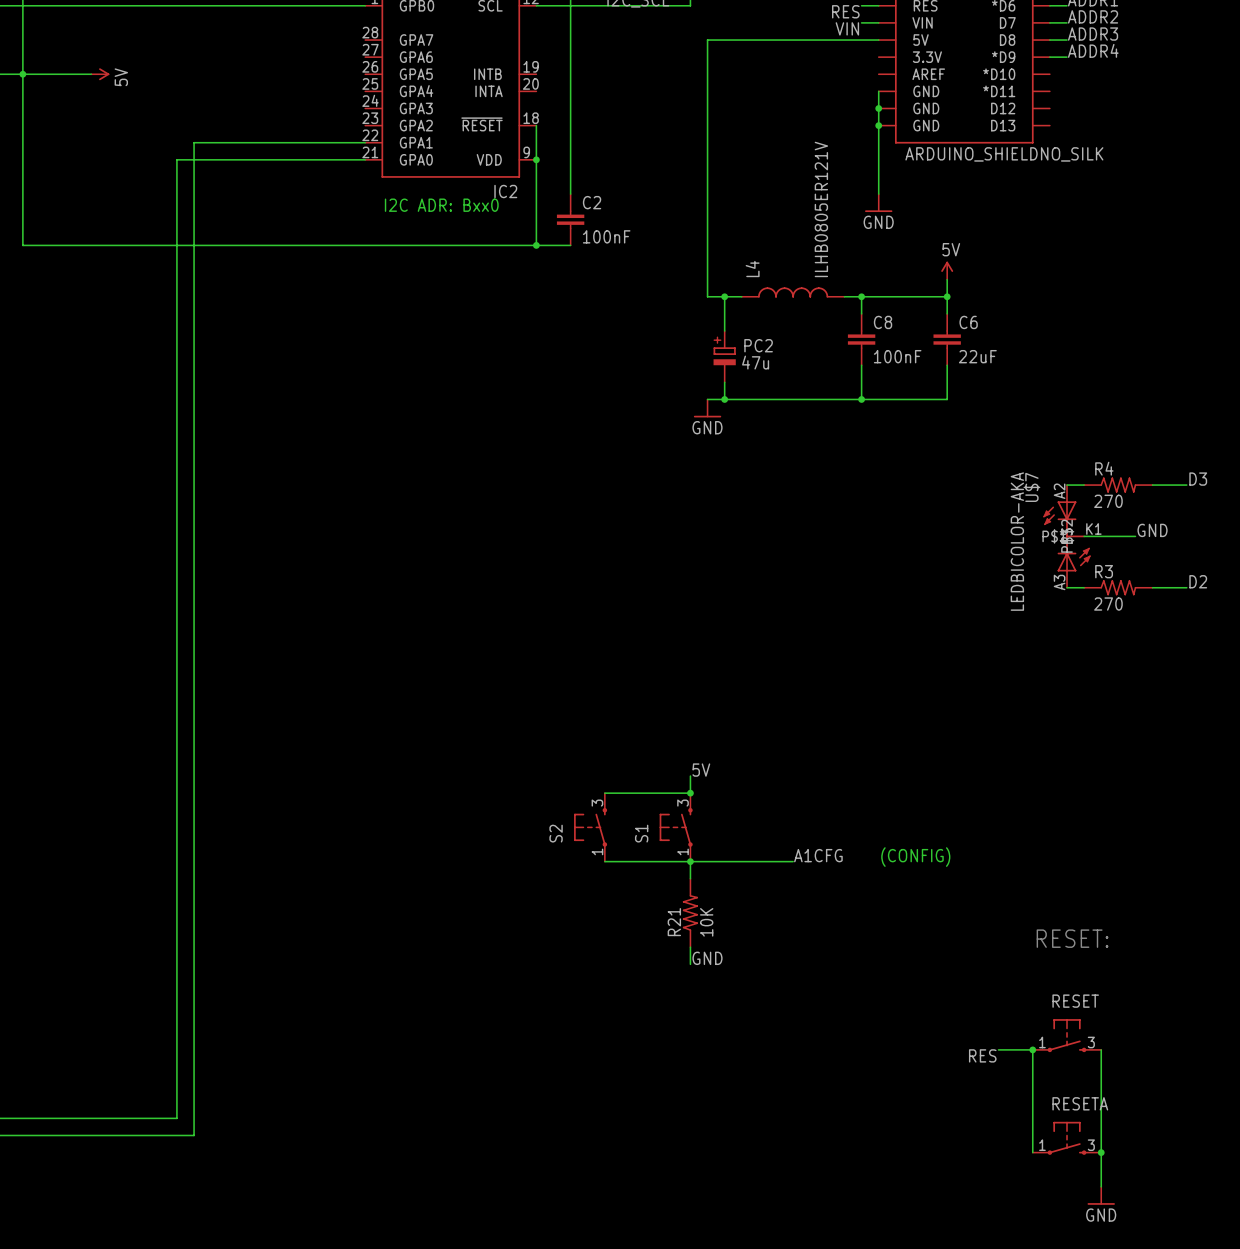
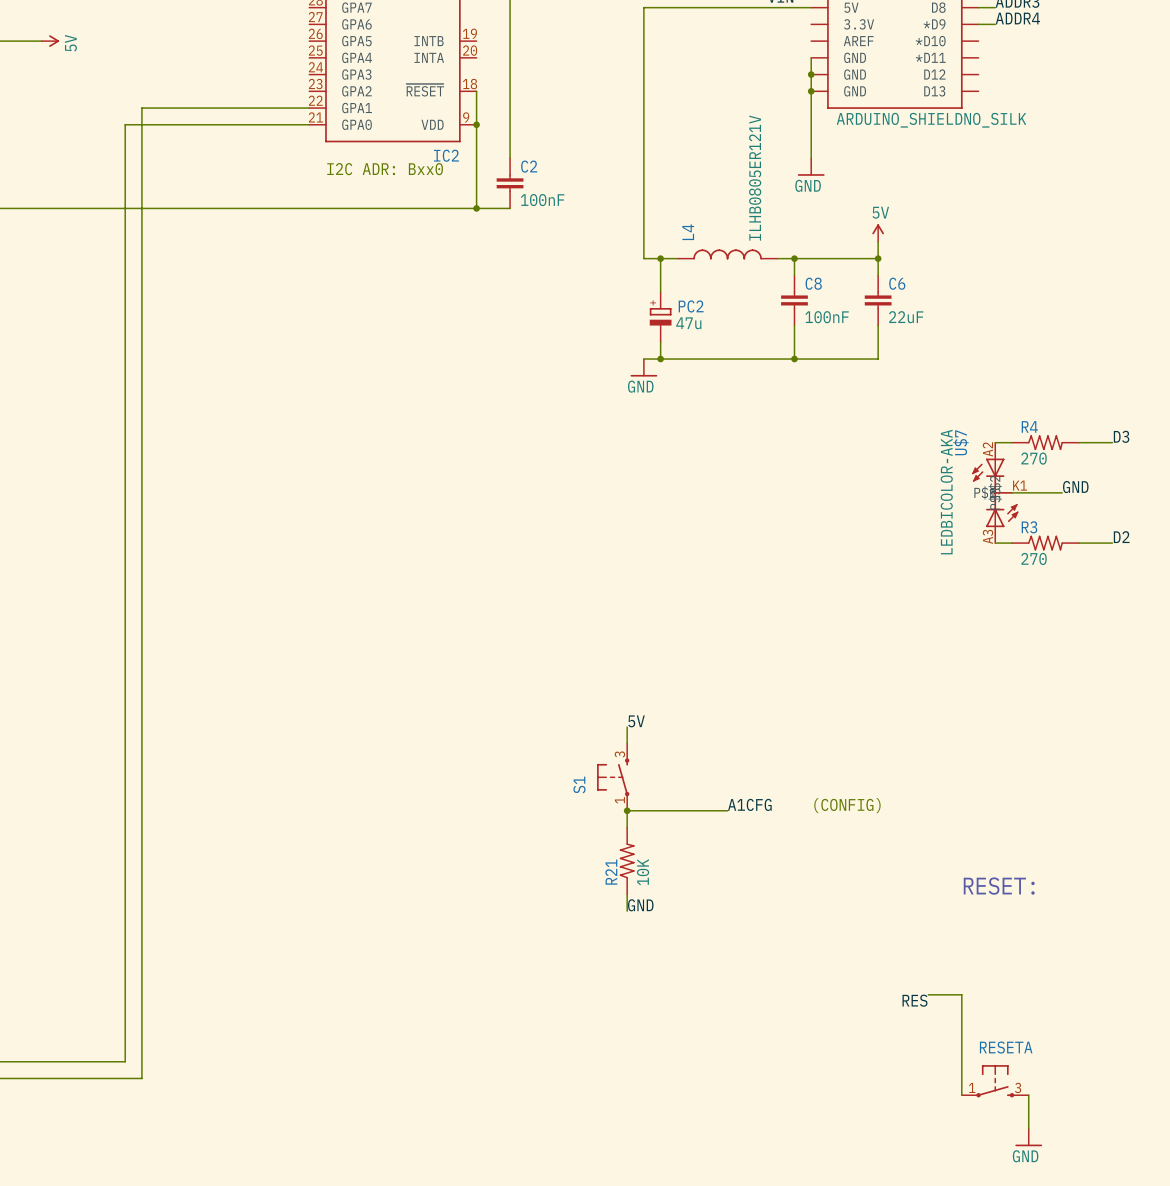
wire: (604, 793) (690, 793) -> none
junction: (690, 793) -> none
S2: (590, 827) -> none
wire: (604, 861) (690, 861) -> none
RESET: (1067, 1035) -> none
junction: (1032, 1049) -> none
wire: (1101, 1049) (1101, 1152) -> none
junction: (1101, 1152) -> none

